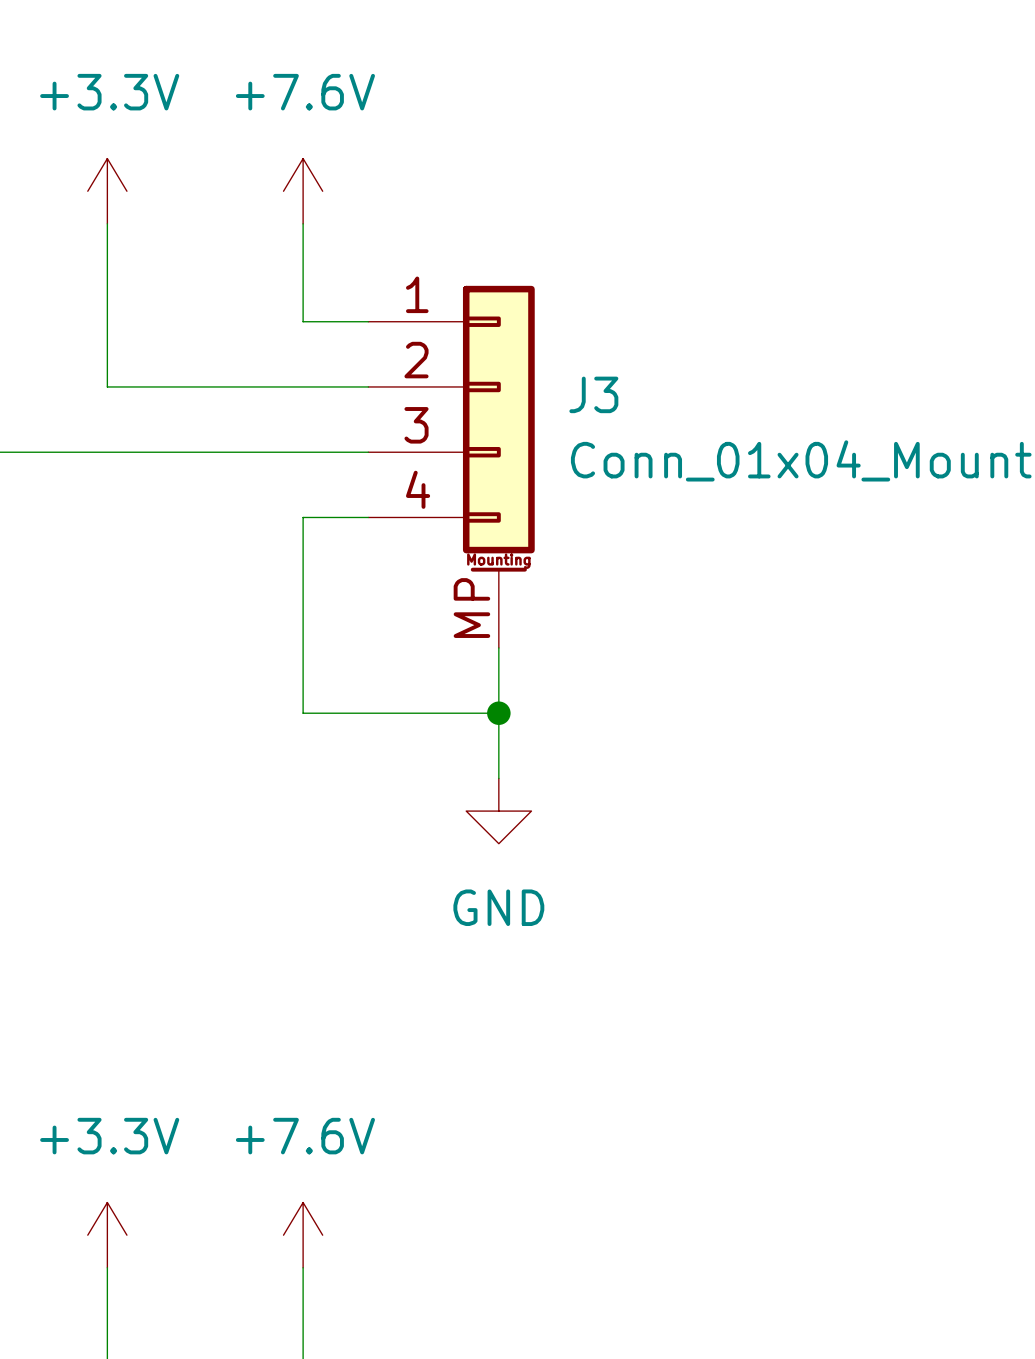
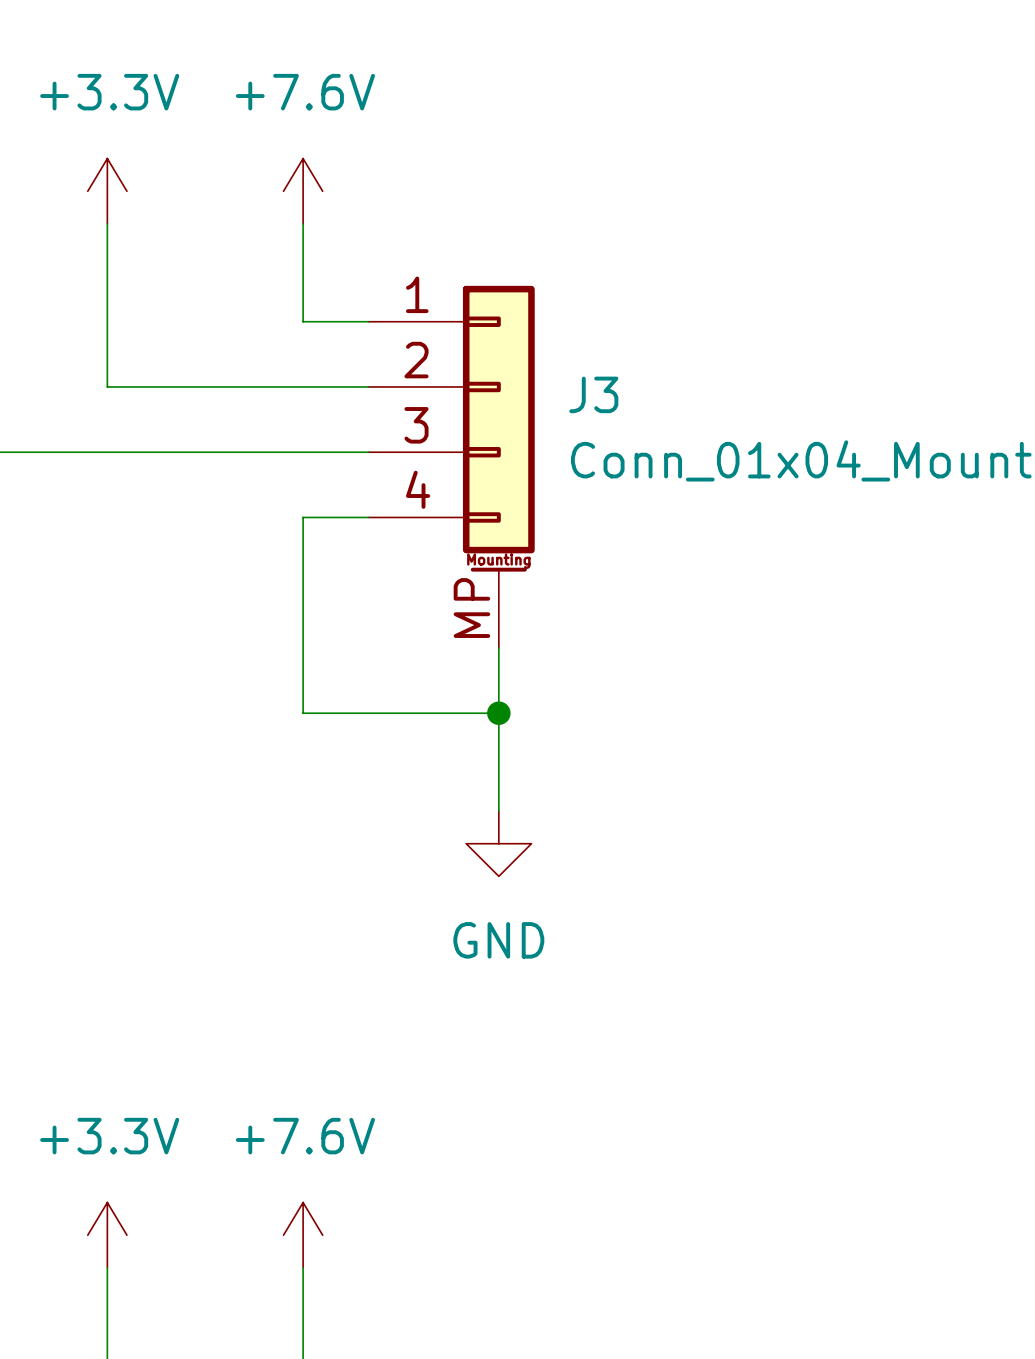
power symbol position: GND (498, 811) -> GND (498, 843)

